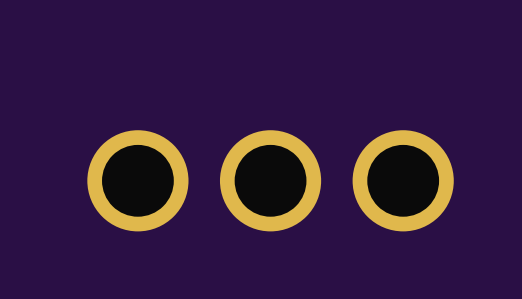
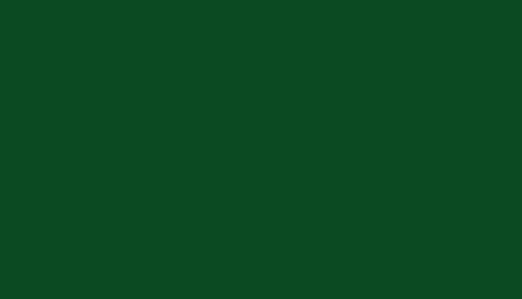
part: (270, 180) -> none

